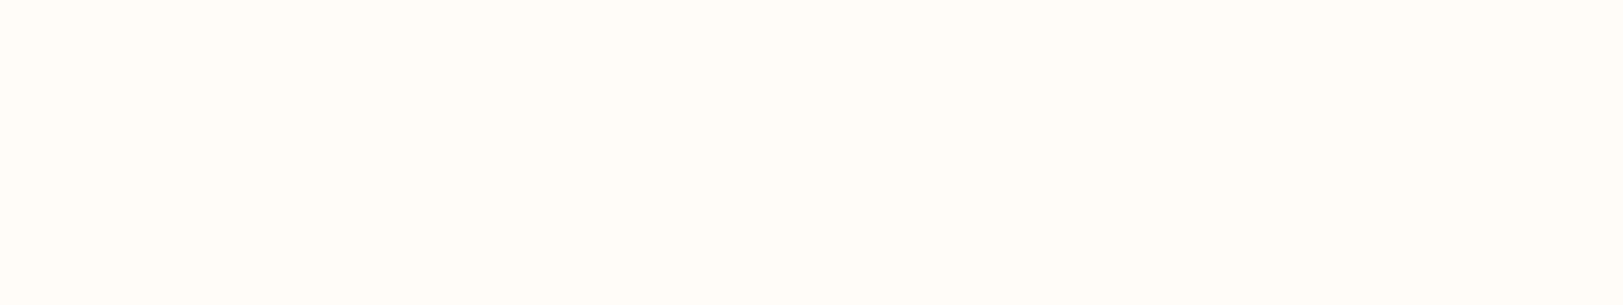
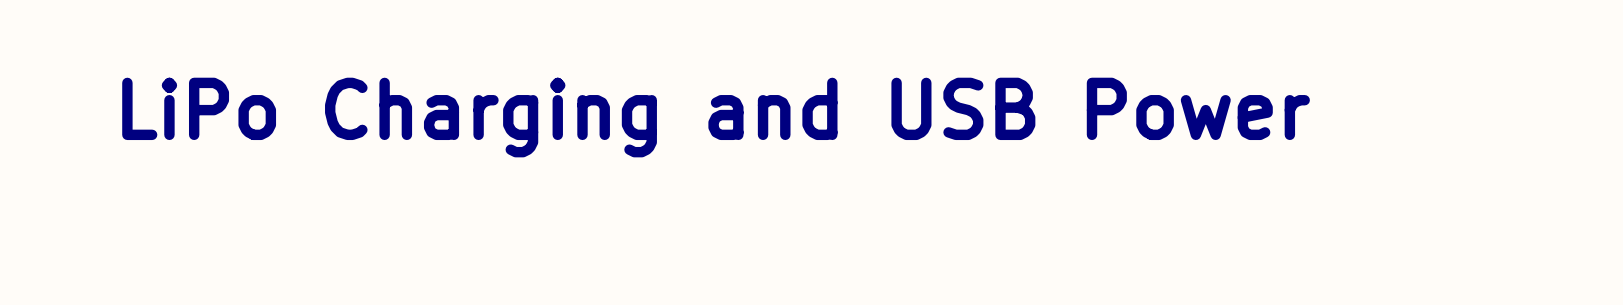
text: none -> LiPo Charging and USB Power (716, 117)

